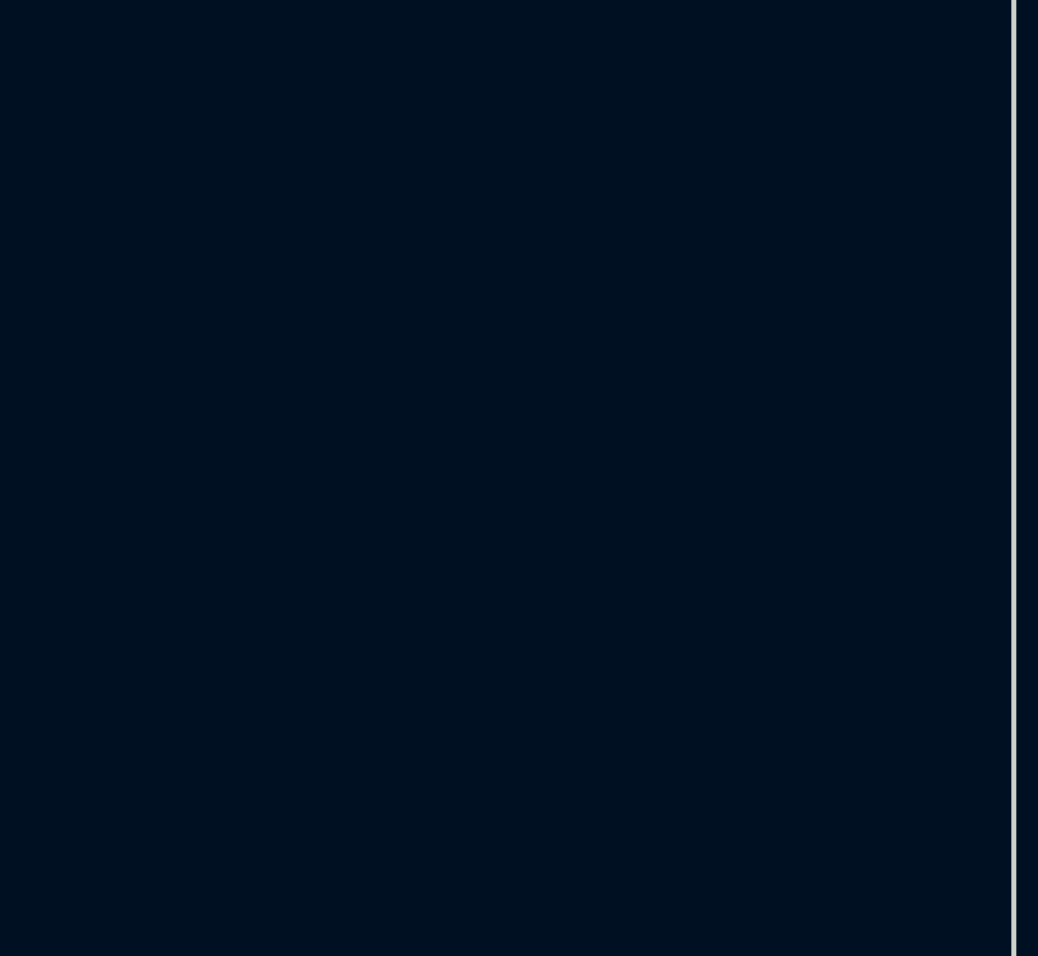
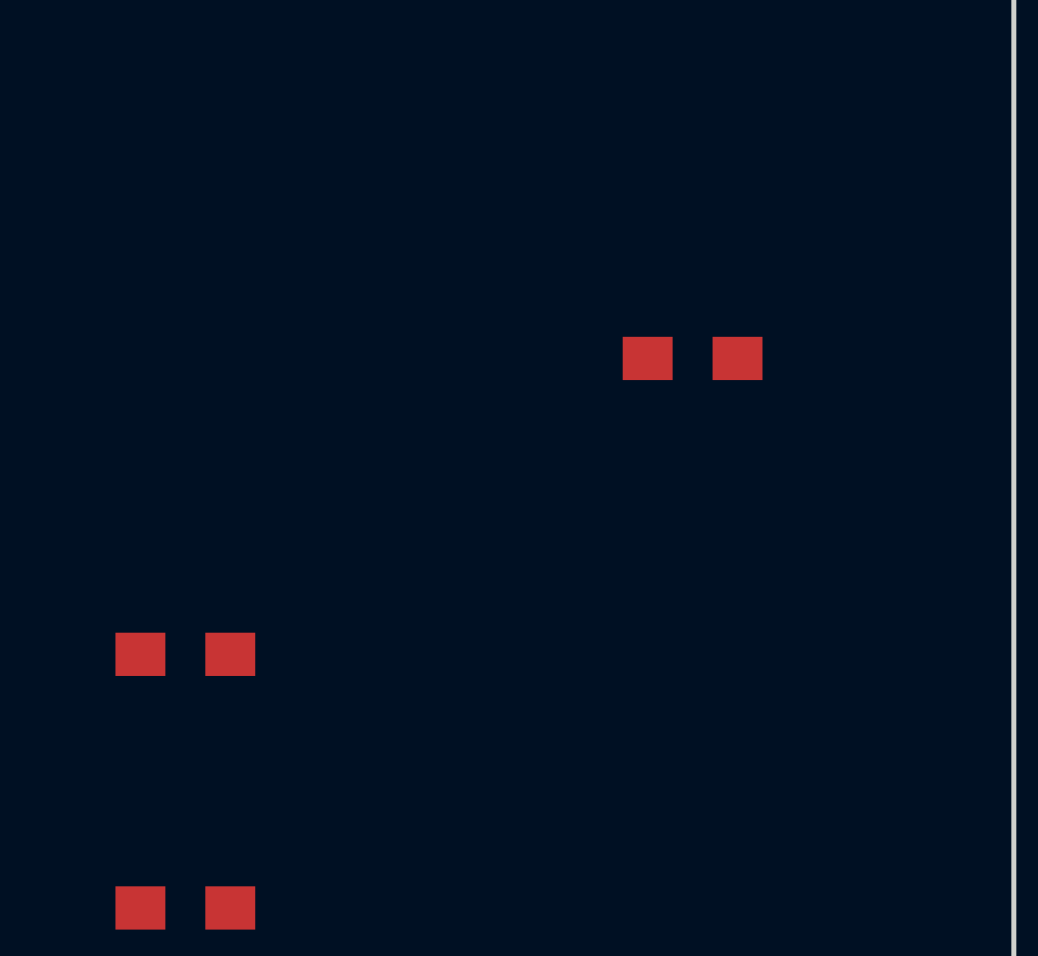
part: none -> (692, 358)
part: none -> (185, 654)
part: none -> (185, 907)

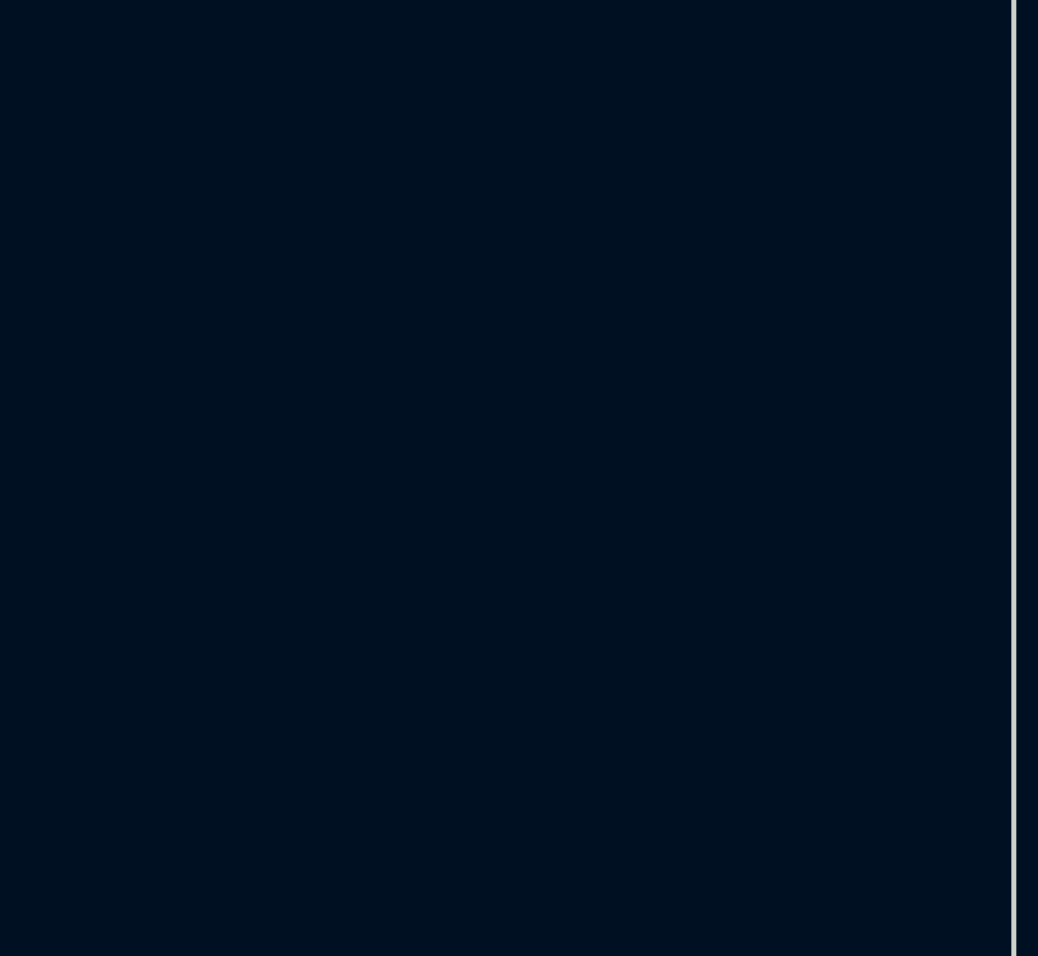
part: (692, 358) -> none
part: (185, 654) -> none
part: (185, 907) -> none

